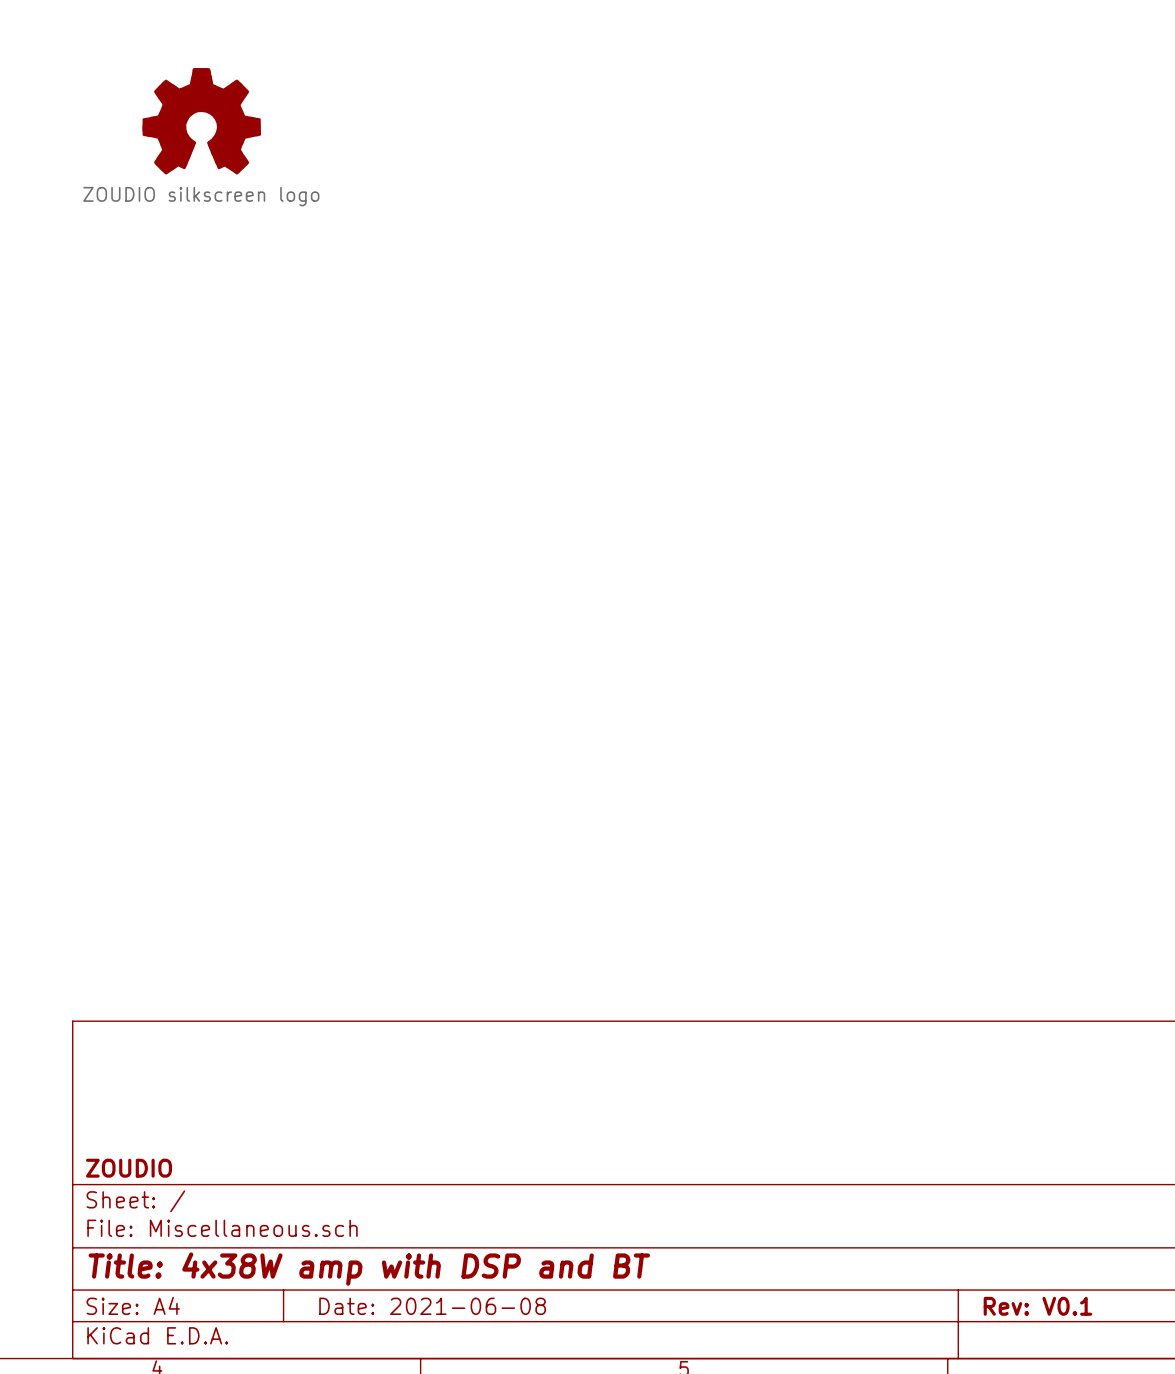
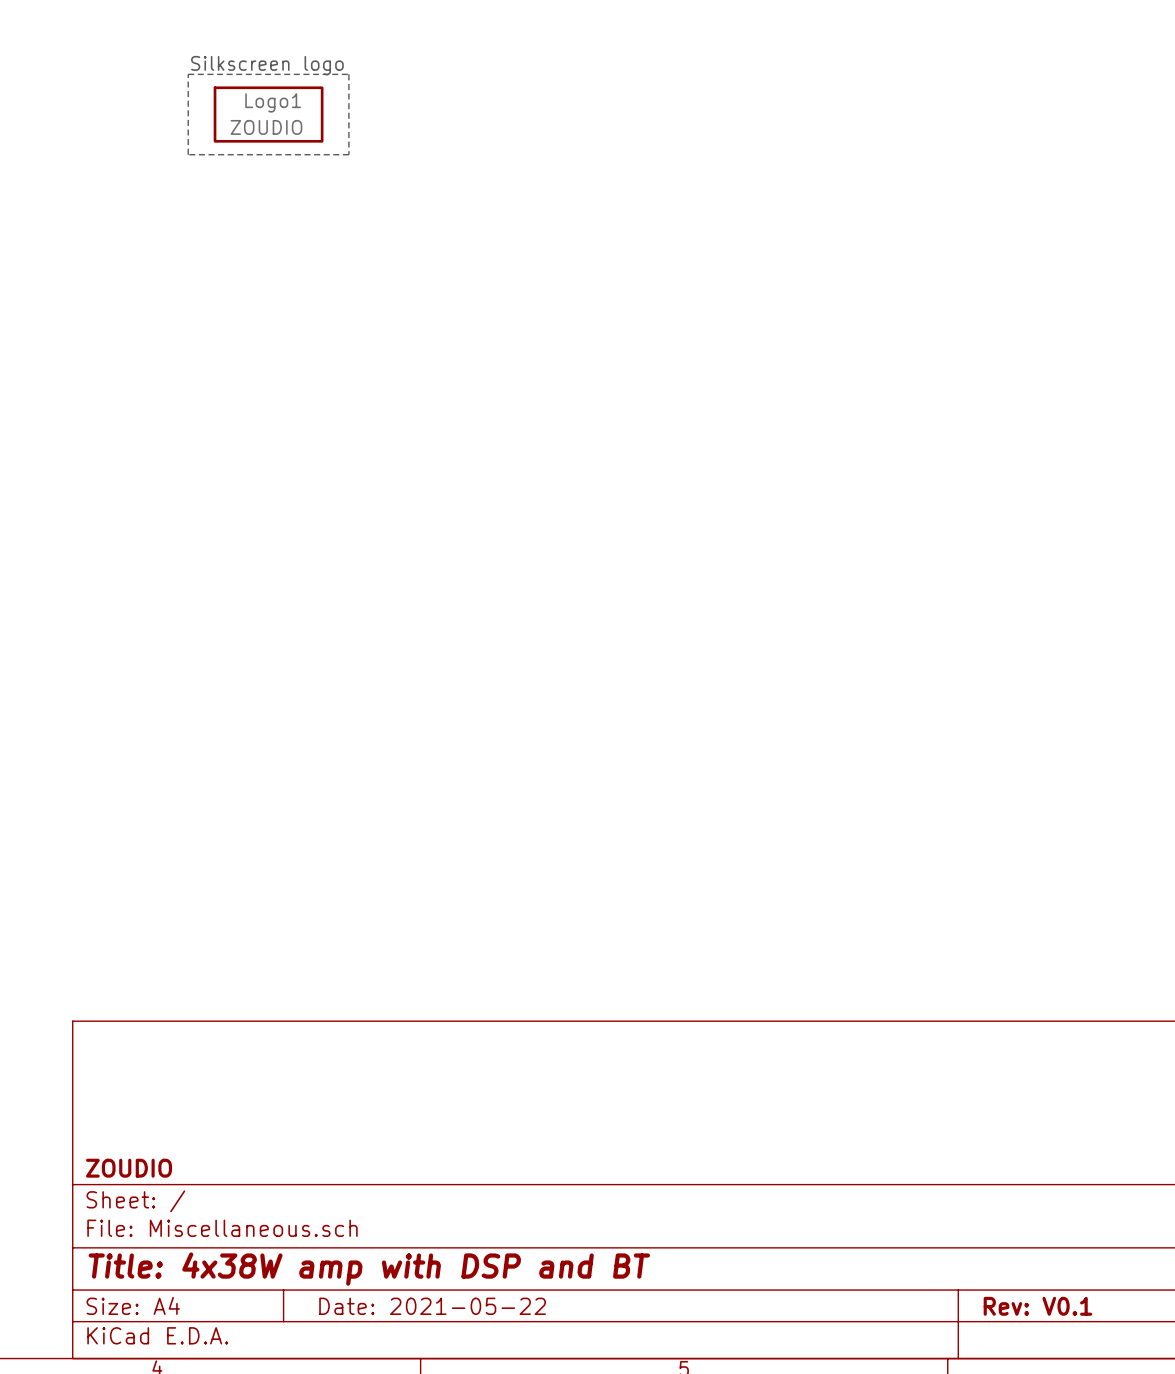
text: none -> Silkscreen logo (267, 65)
line: none -> (188, 74) (348, 74) (348, 154) (188, 154) (188, 74)
Logo1: none -> ZOUDIO (268, 114)
power symbol: ZOUDIO silkscreen logo (201, 121) -> none
title block: Date: 2021-06-08 (432, 1306) -> Date: 2021-05-22 (432, 1306)

